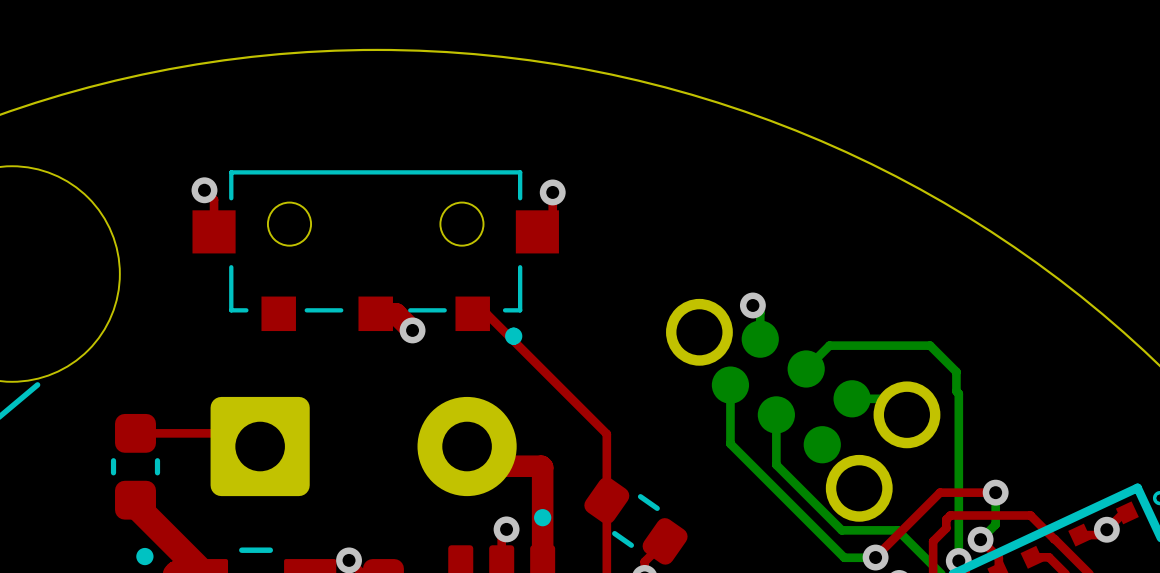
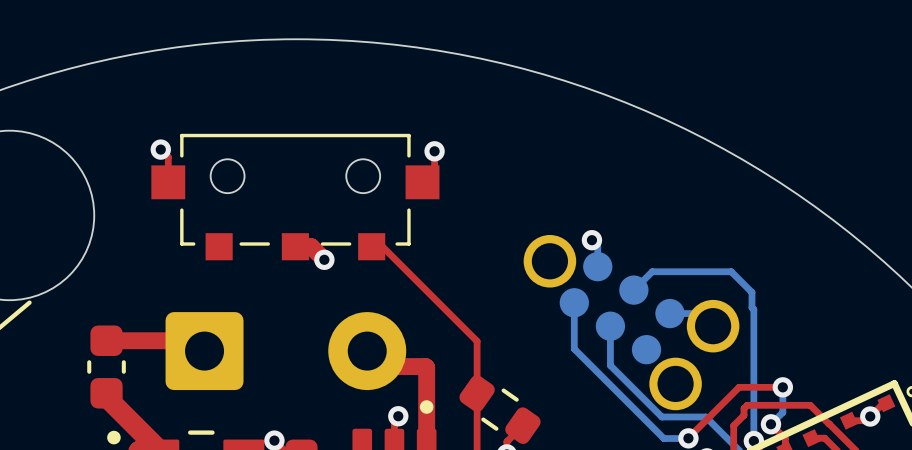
part footprint: [192, 170, 559, 345] -> [151, 133, 440, 261]
top track width: thin (135, 433) (246, 433) -> thick (106, 340) (194, 340)

